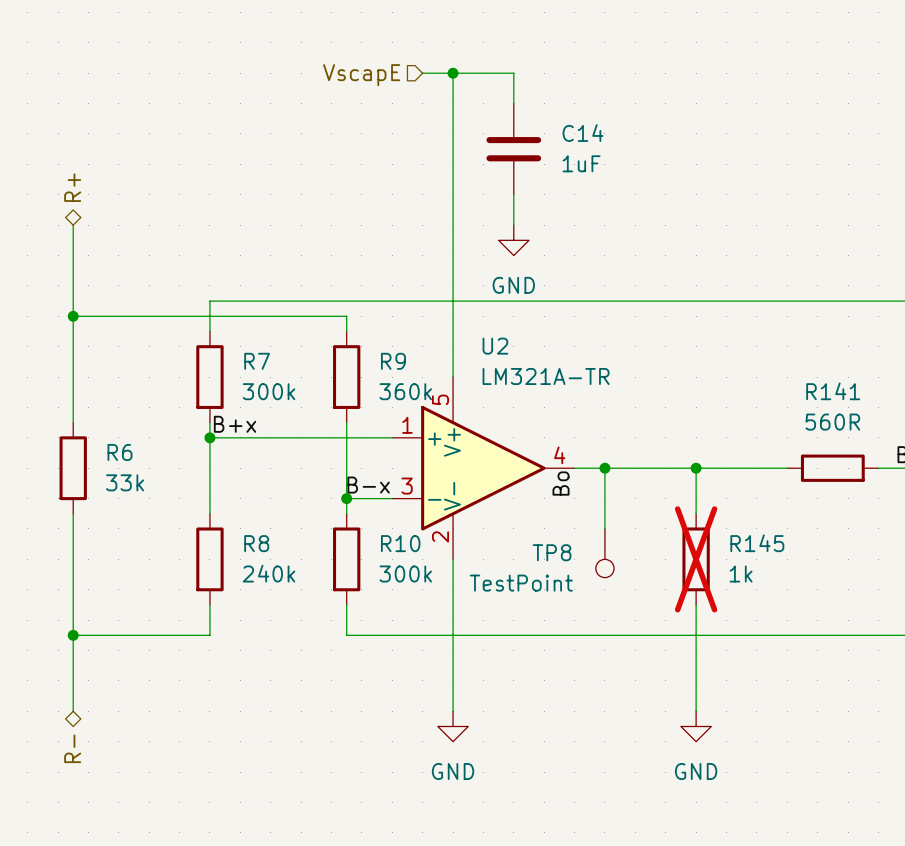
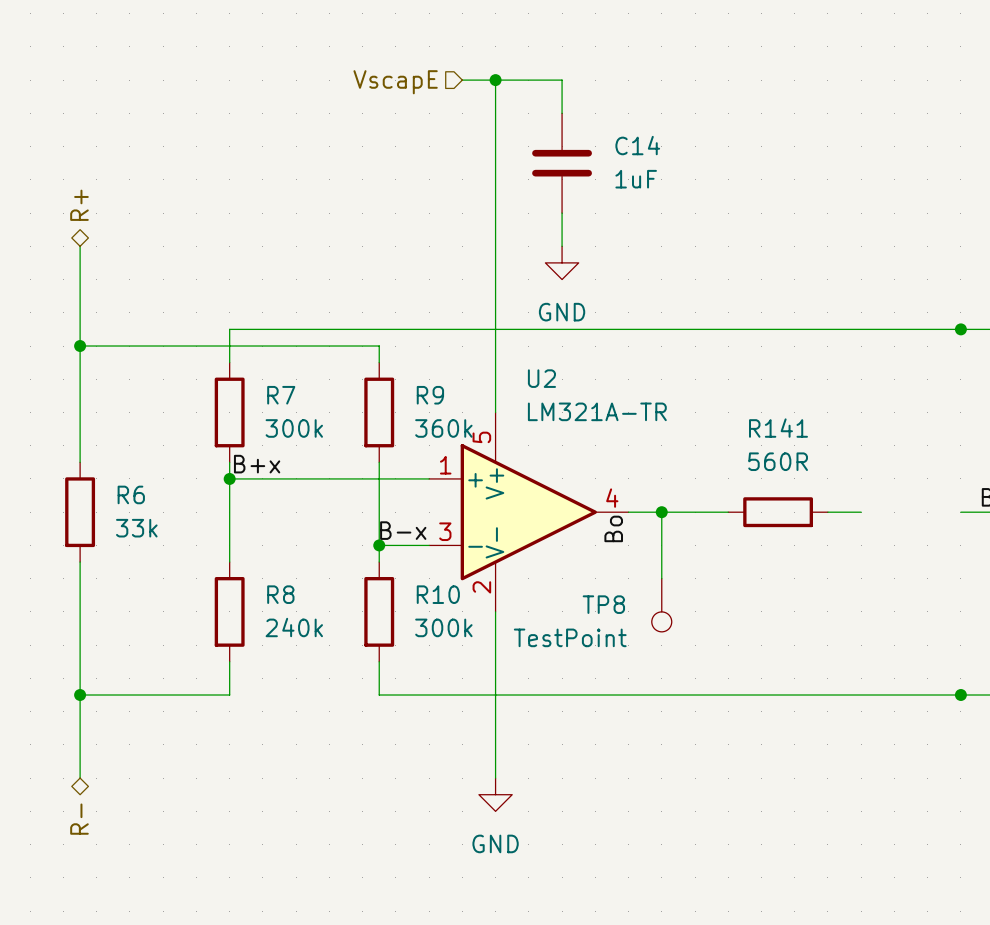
junction: none -> (960, 329)
wire: (665, 468) (756, 468) -> none
wire: (696, 468) (696, 513) -> none
junction: (696, 468) -> none
R141 position: (832, 468) -> (778, 512)
R145: 1k (696, 559) -> none
wire: (696, 604) (696, 711) -> none
junction: none -> (960, 695)
power symbol: GND (696, 726) -> none

